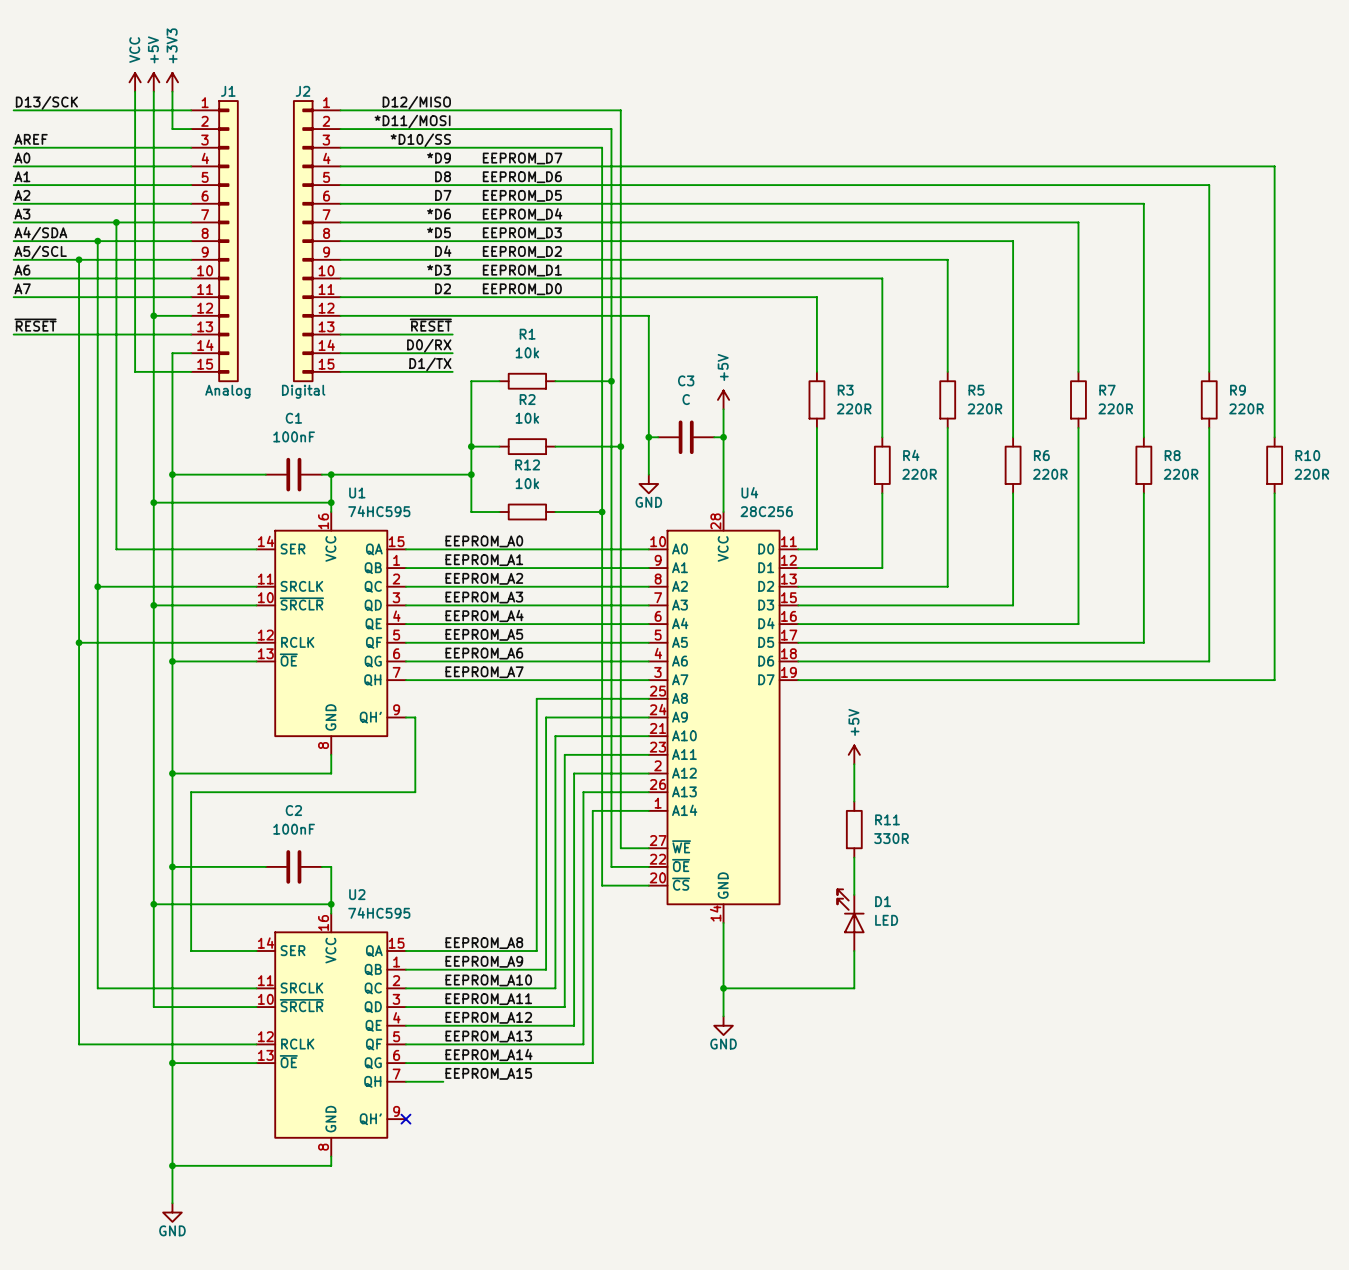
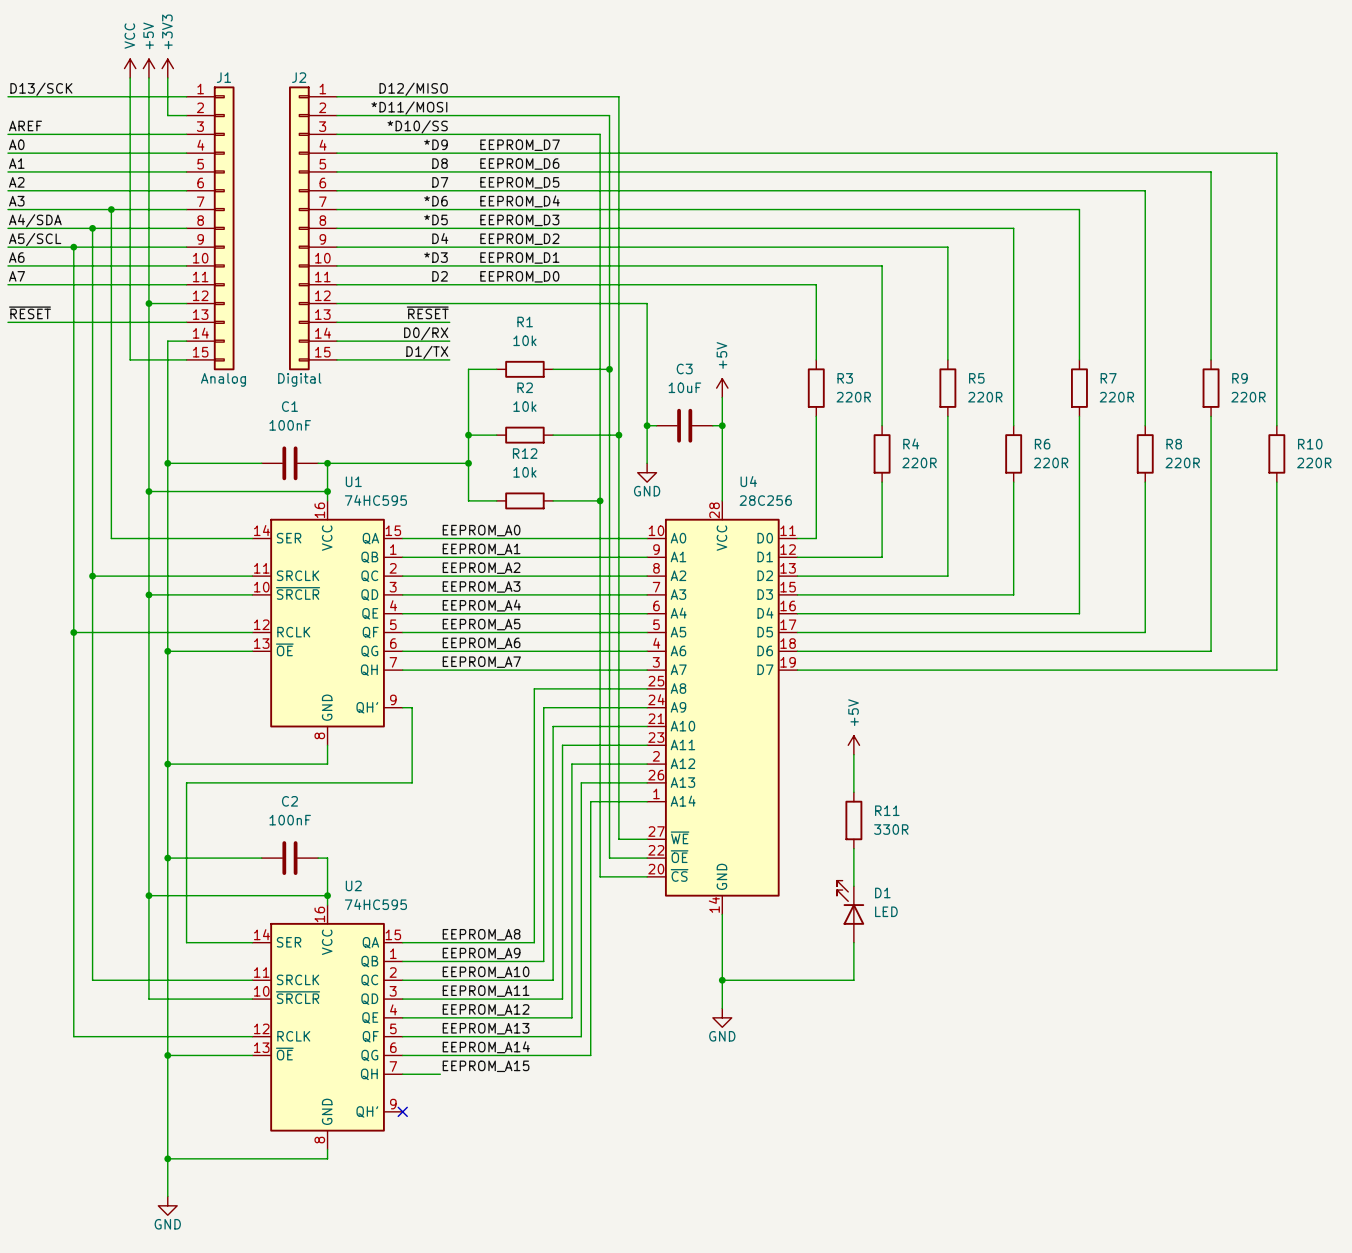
C3 value: C (686, 399) -> 10uF (684, 387)

